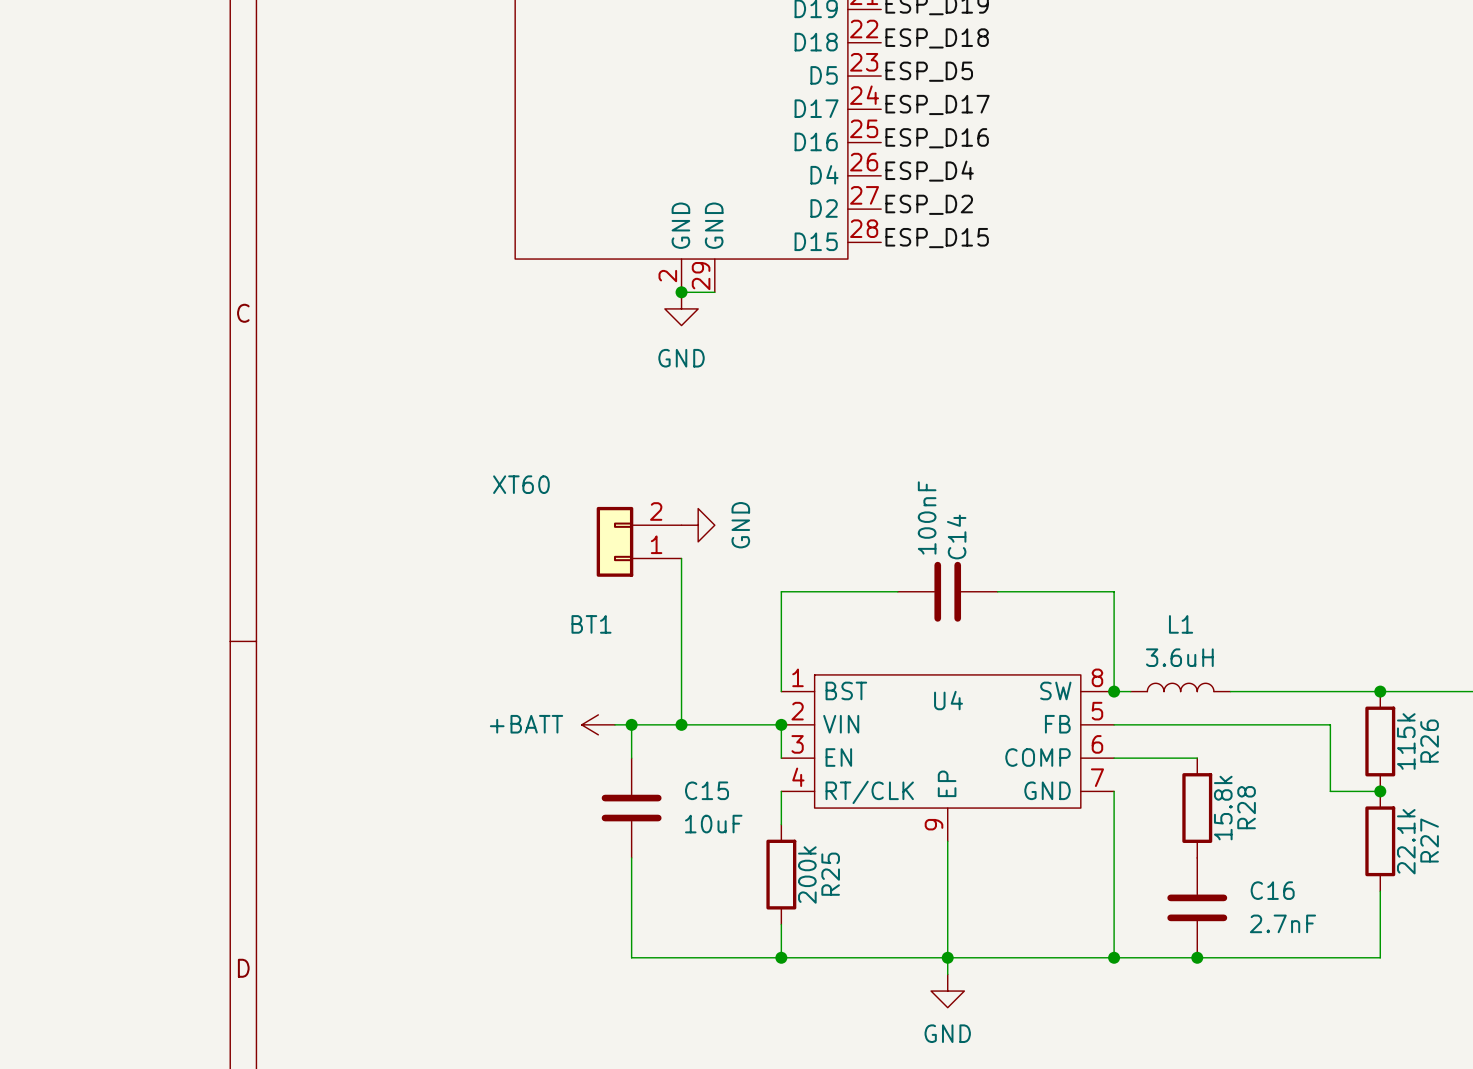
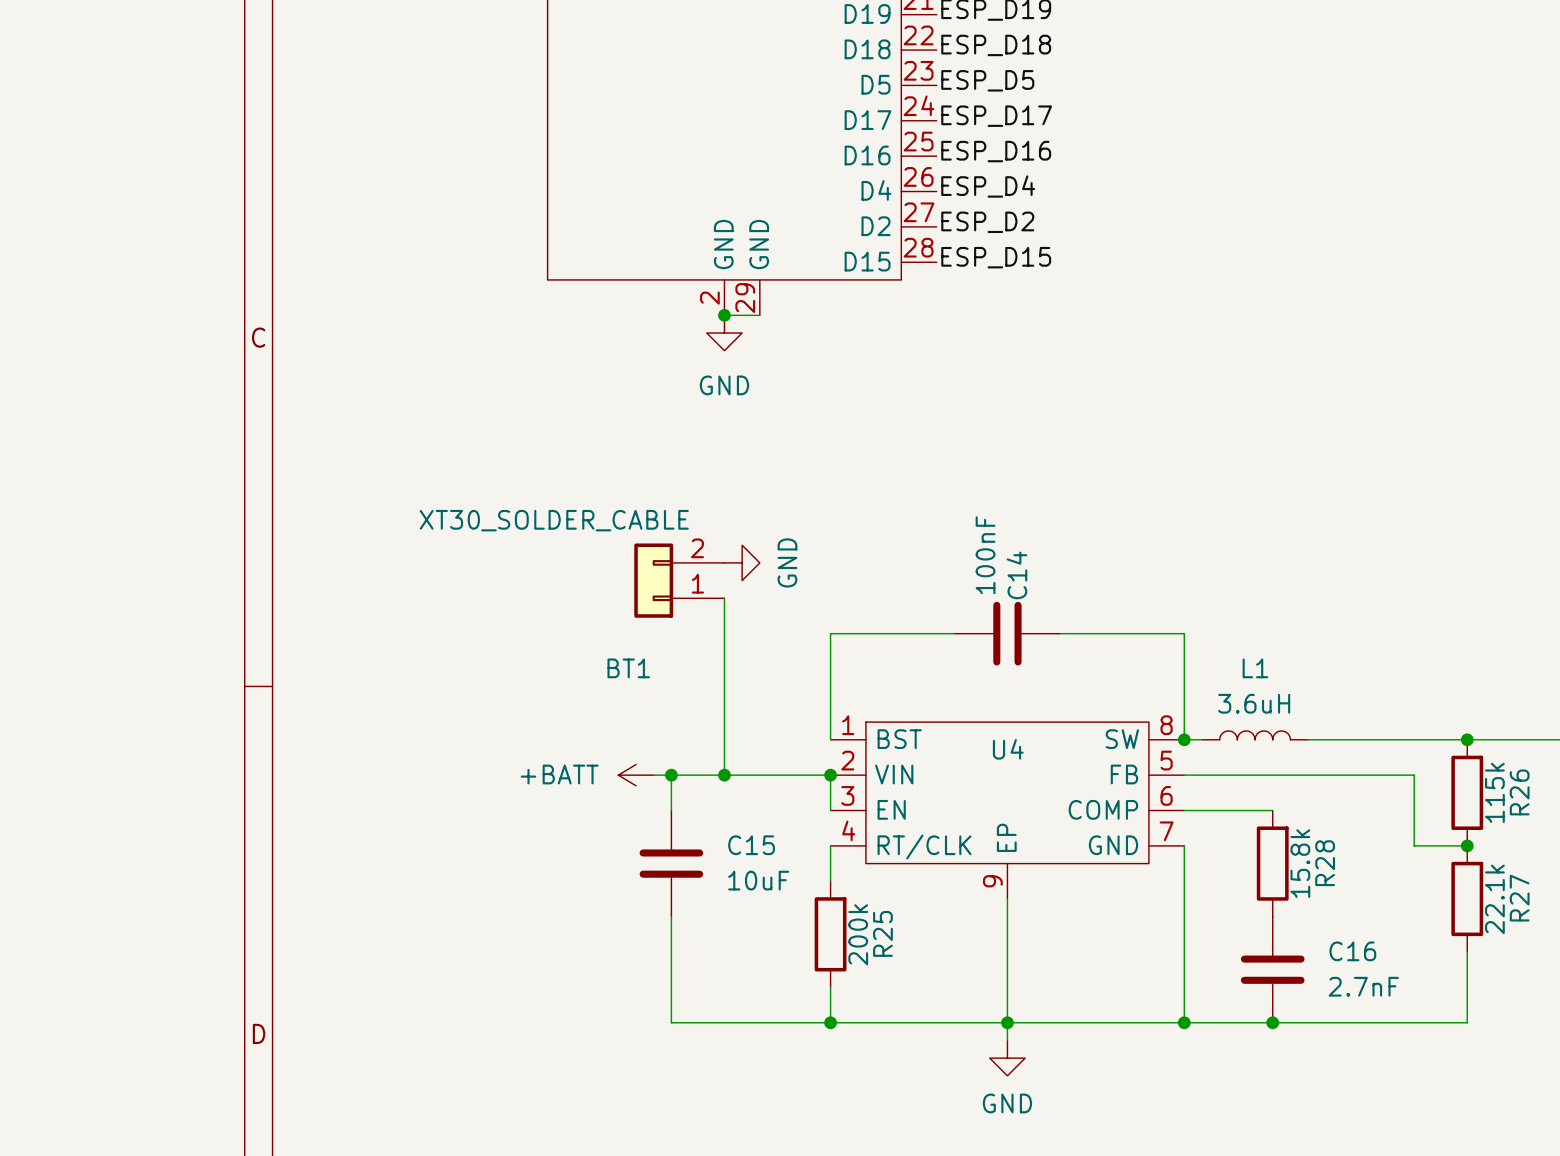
BT1 value: XT60 (521, 484) -> XT30_SOLDER_CABLE (554, 520)

